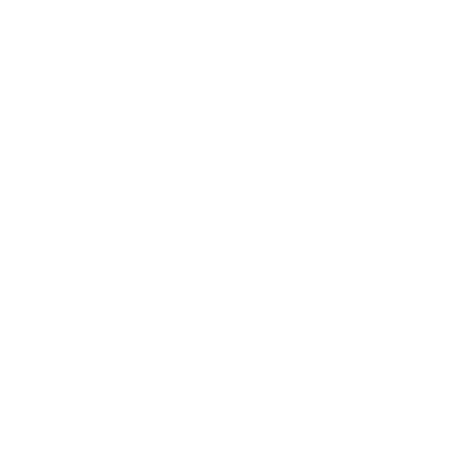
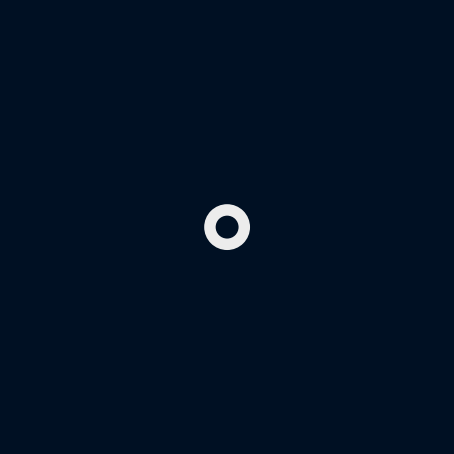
via: none -> (227, 227)

